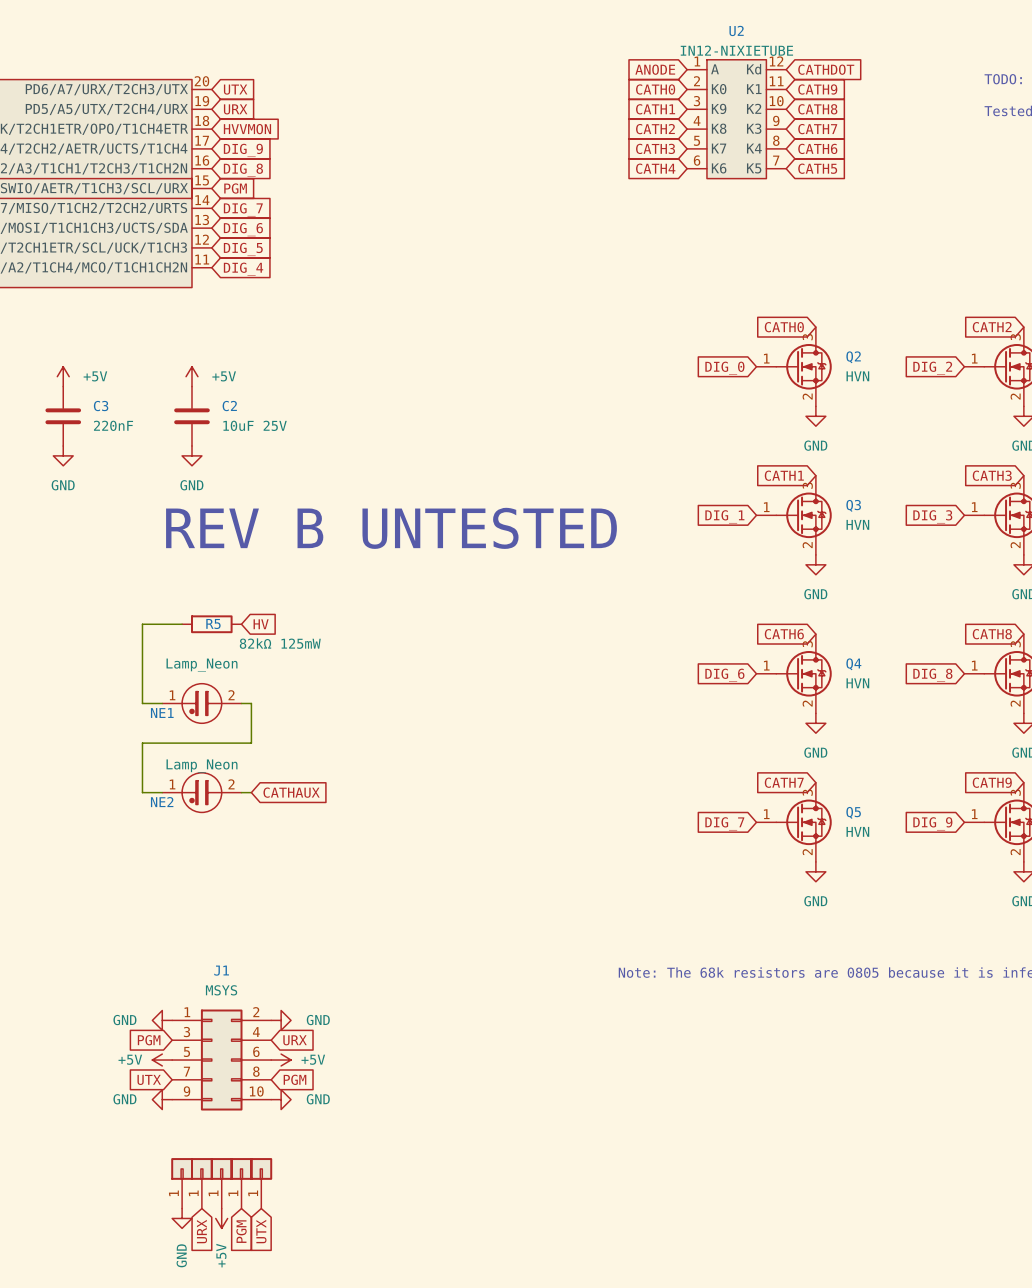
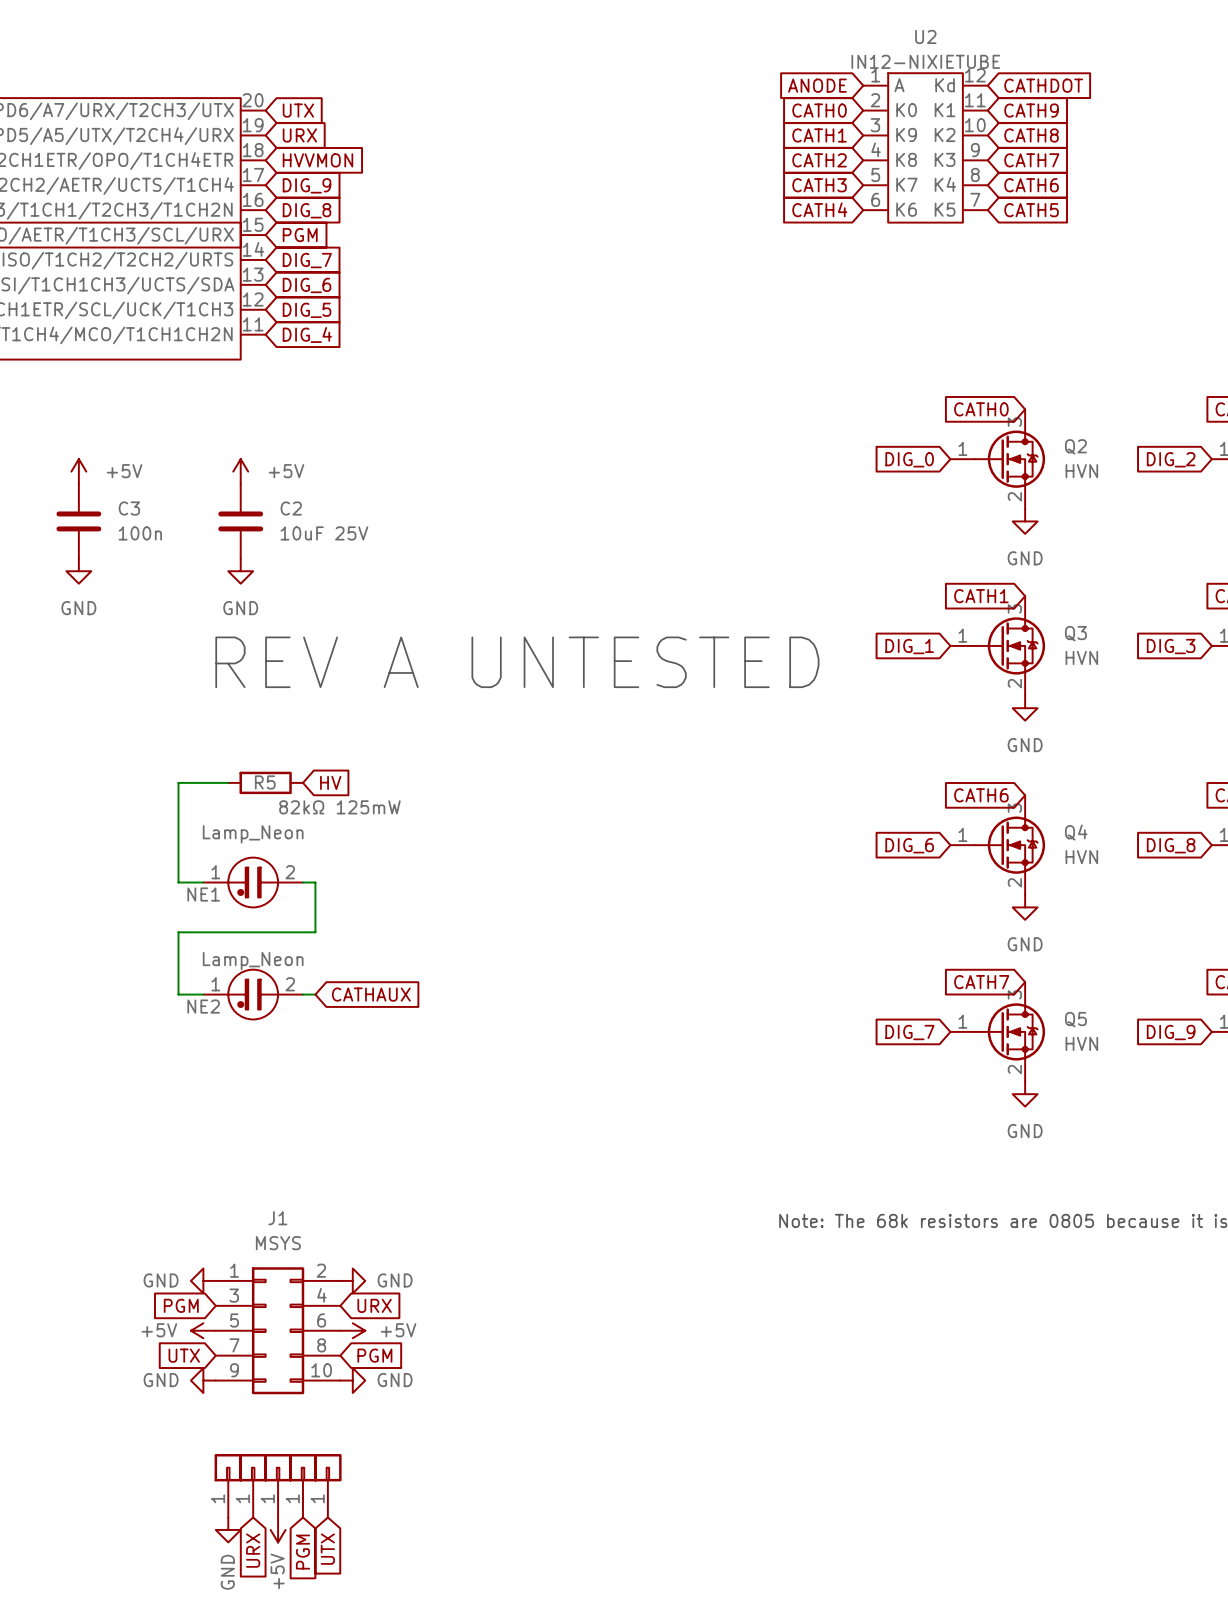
C3 value: 220nF (113, 425) -> 100n (140, 533)
text: REV B UNTESTED (391, 528) -> REV A UNTESTED (517, 662)

